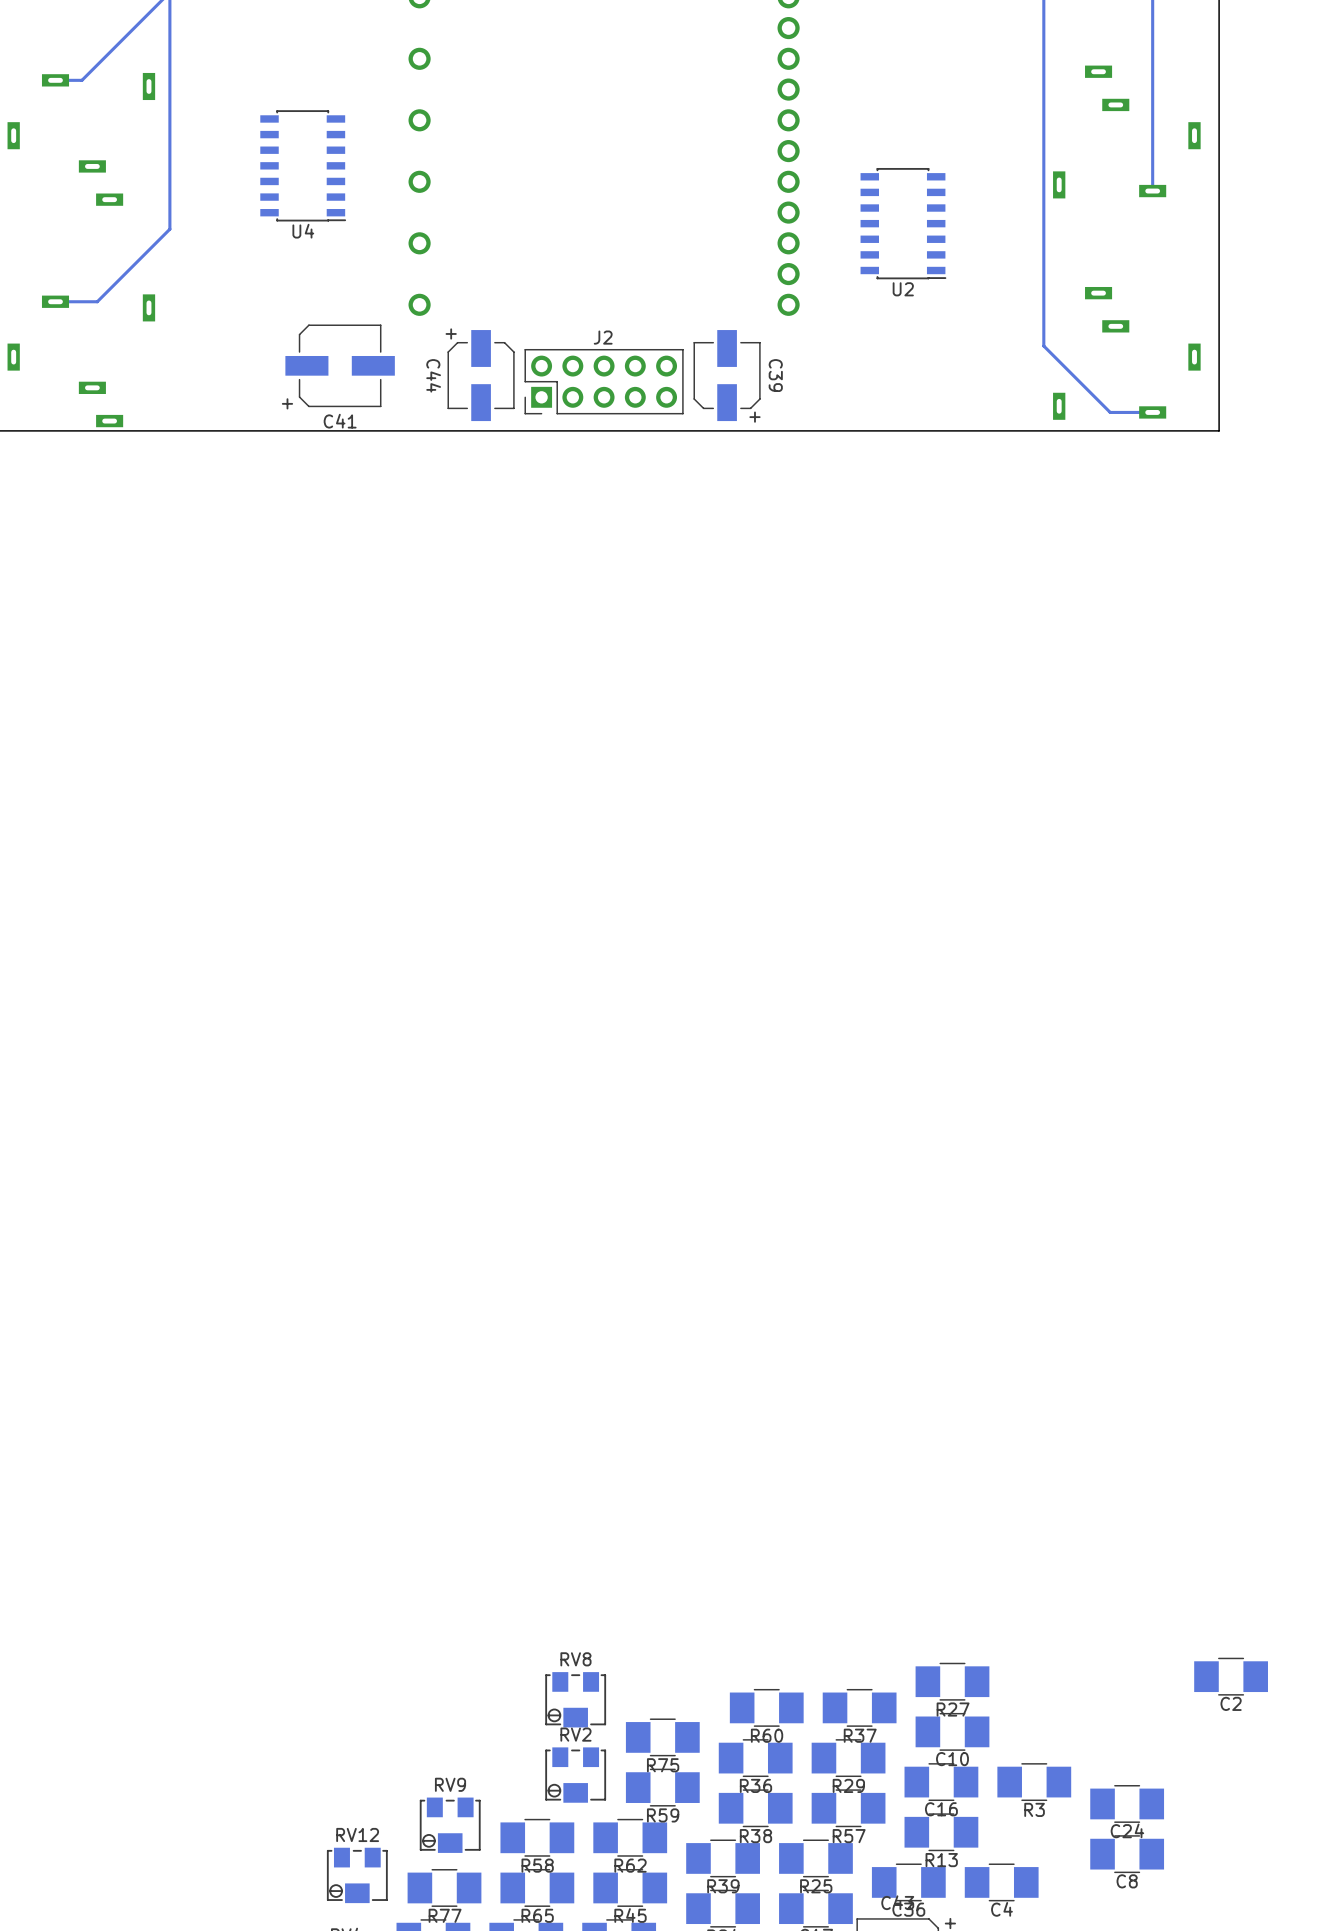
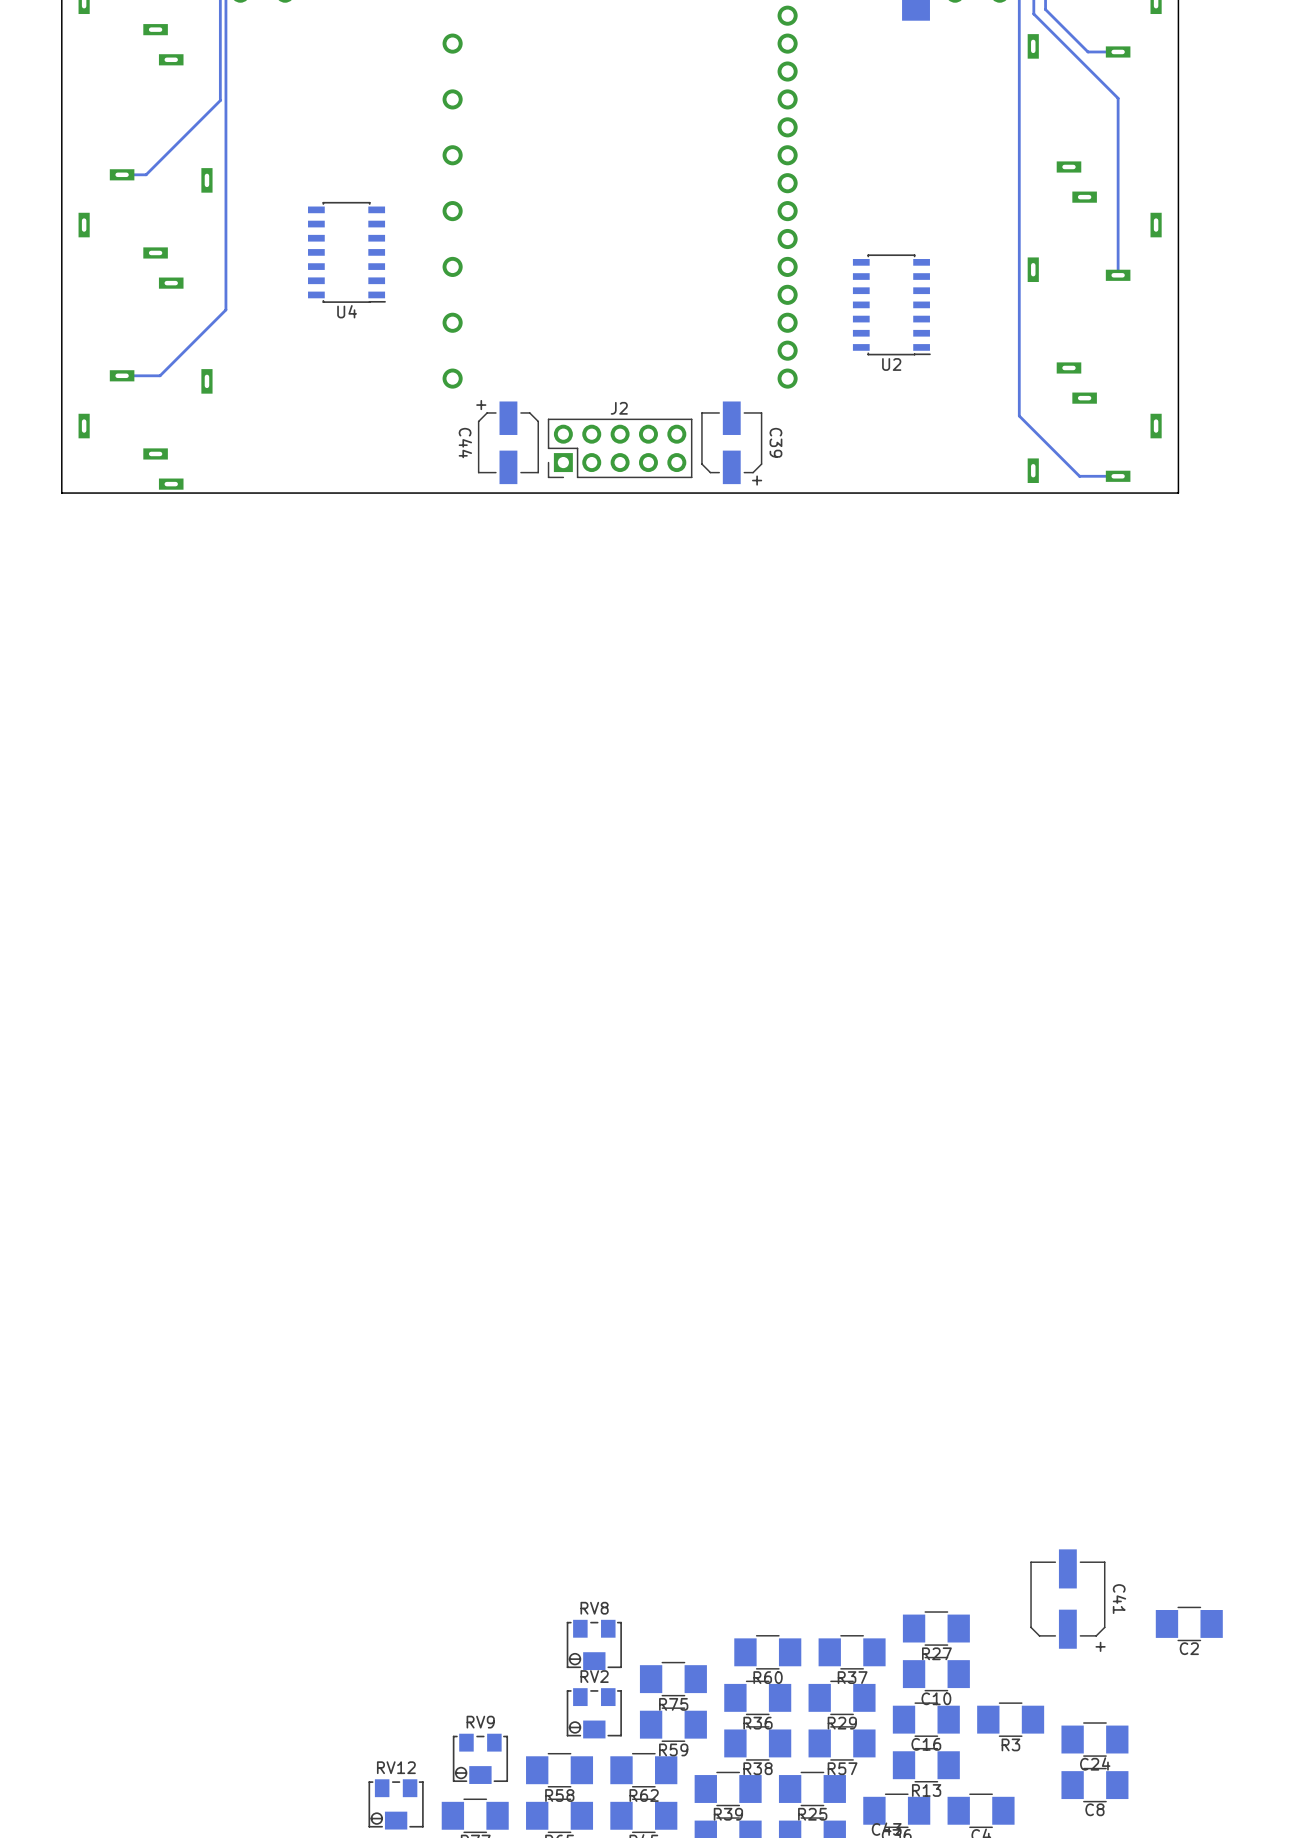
C41 rotation: 0° (340, 365) -> 90° counterclockwise (1067, 1599)
C41 position: (340, 365) -> (1067, 1599)

